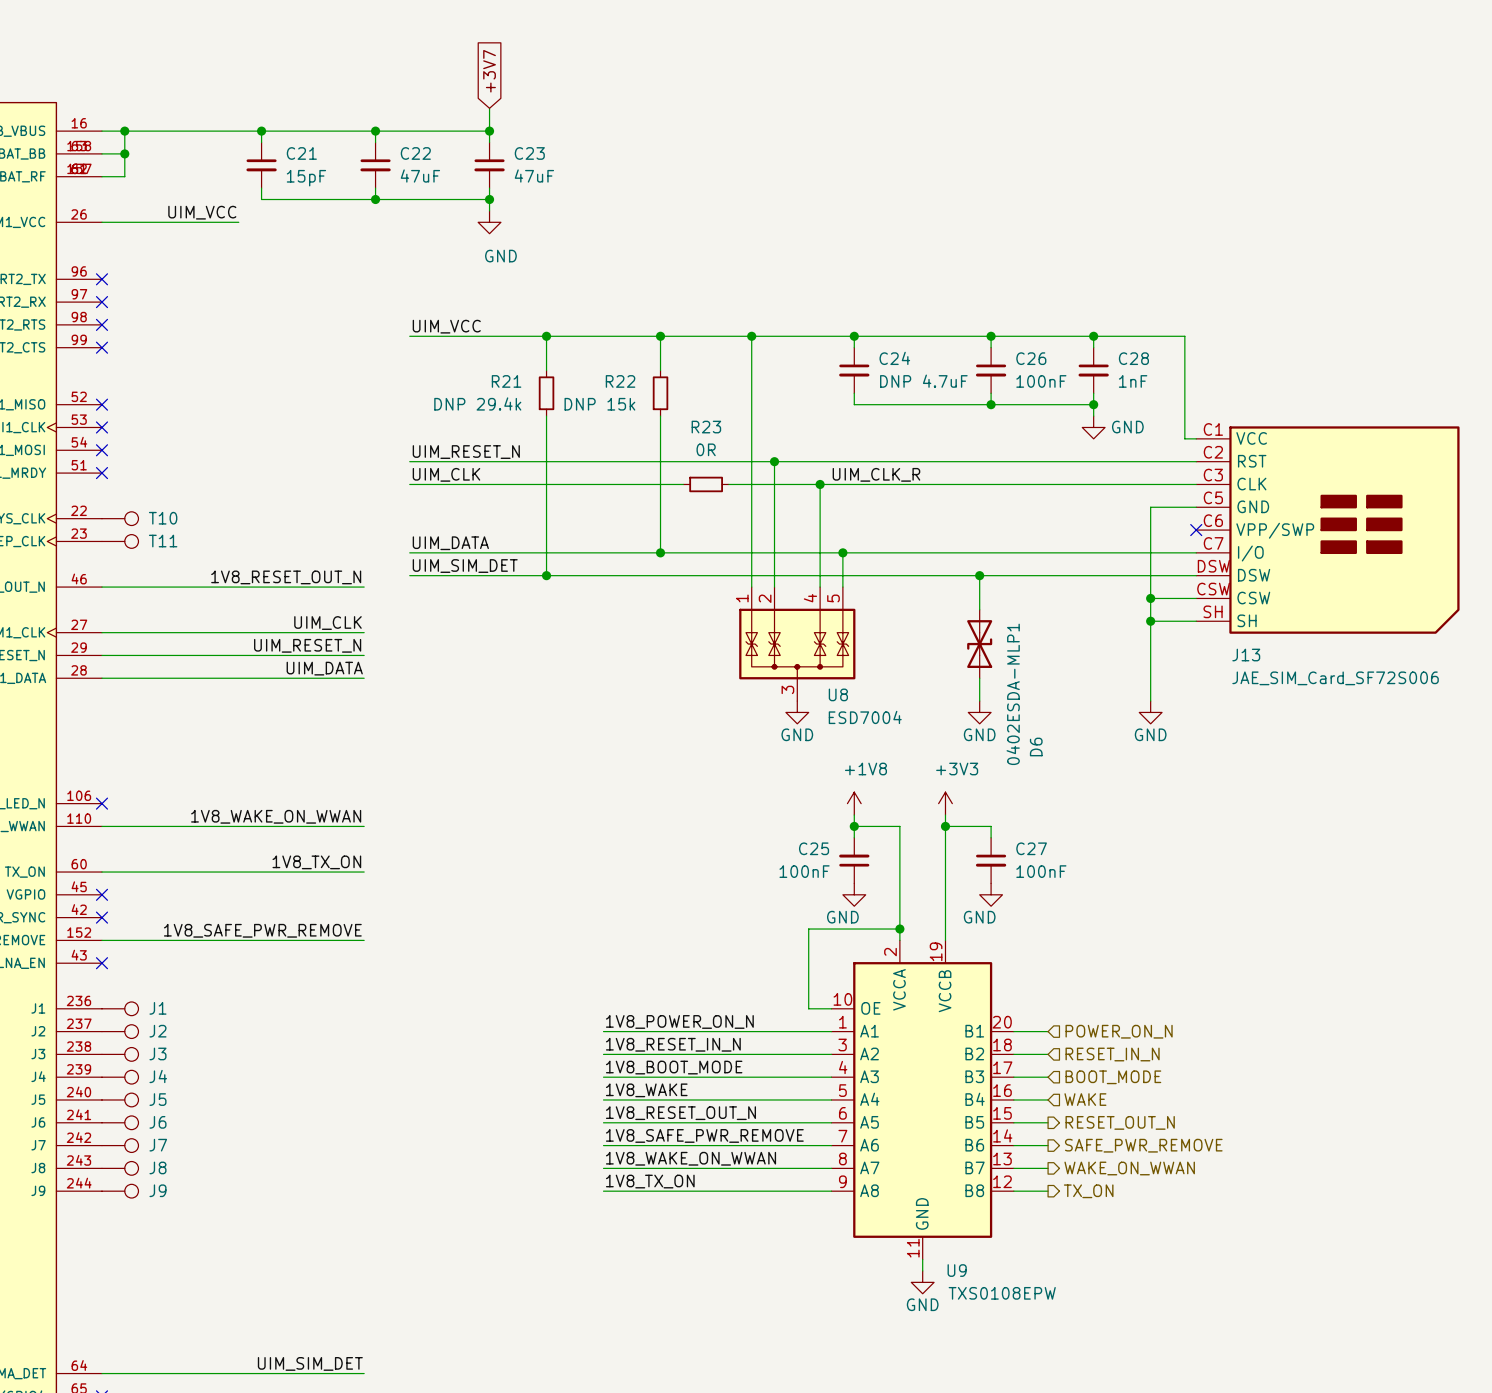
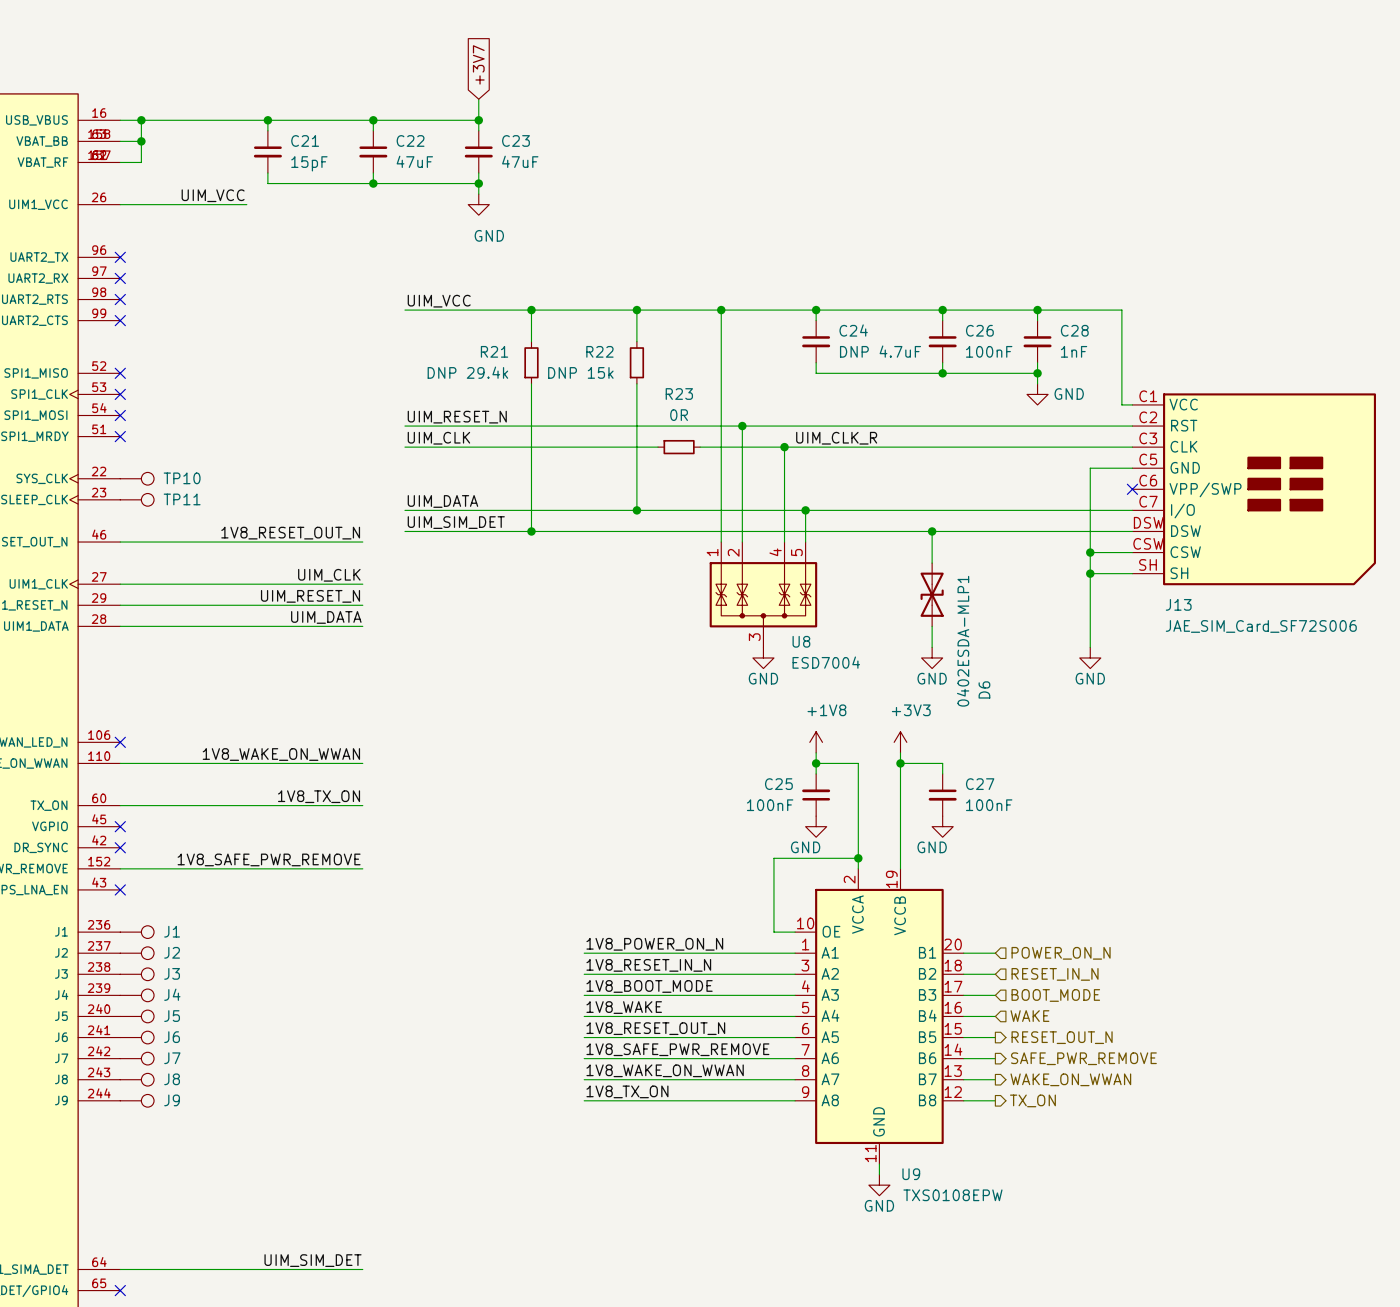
T10 name: T10 (163, 518) -> TP10 (182, 478)
T11 name: T11 (163, 541) -> TP11 (182, 499)

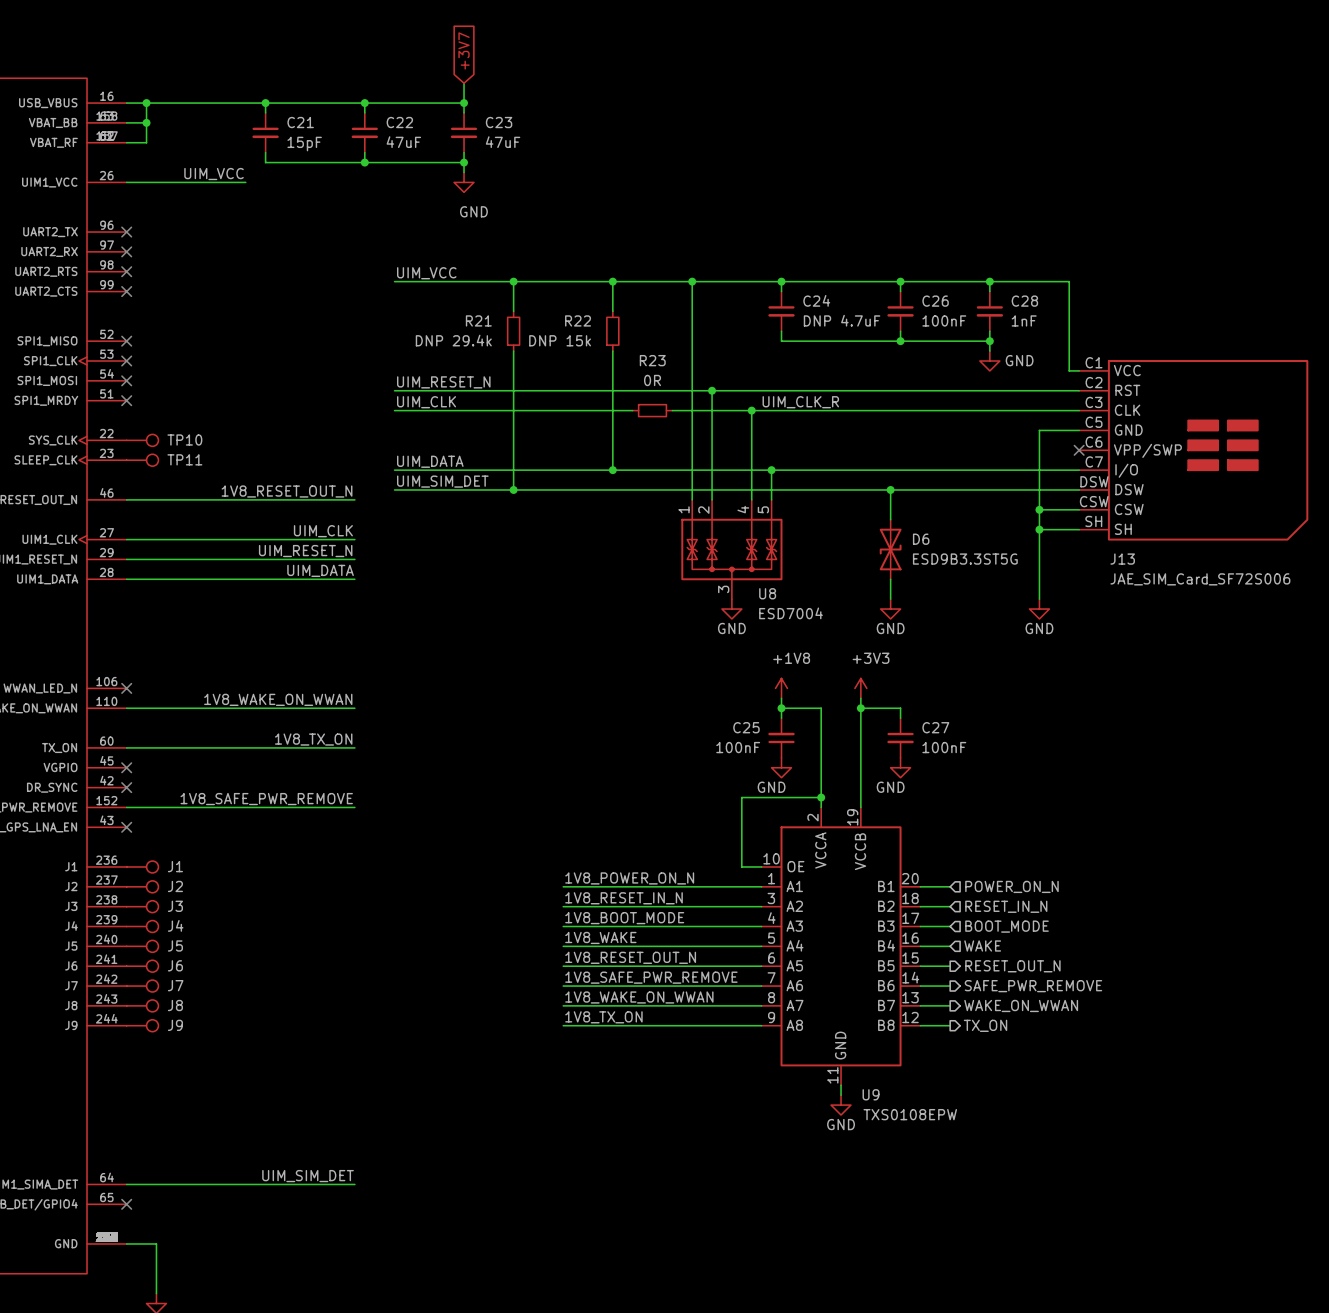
D6 value: 0402ESDA-MLP1 (963, 641) -> ESD9B3.3ST5G (965, 559)
D6 name rotation: 0° (984, 689) -> 90° clockwise (921, 539)
D6 name position: D6 (984, 689) -> D6 (921, 539)

